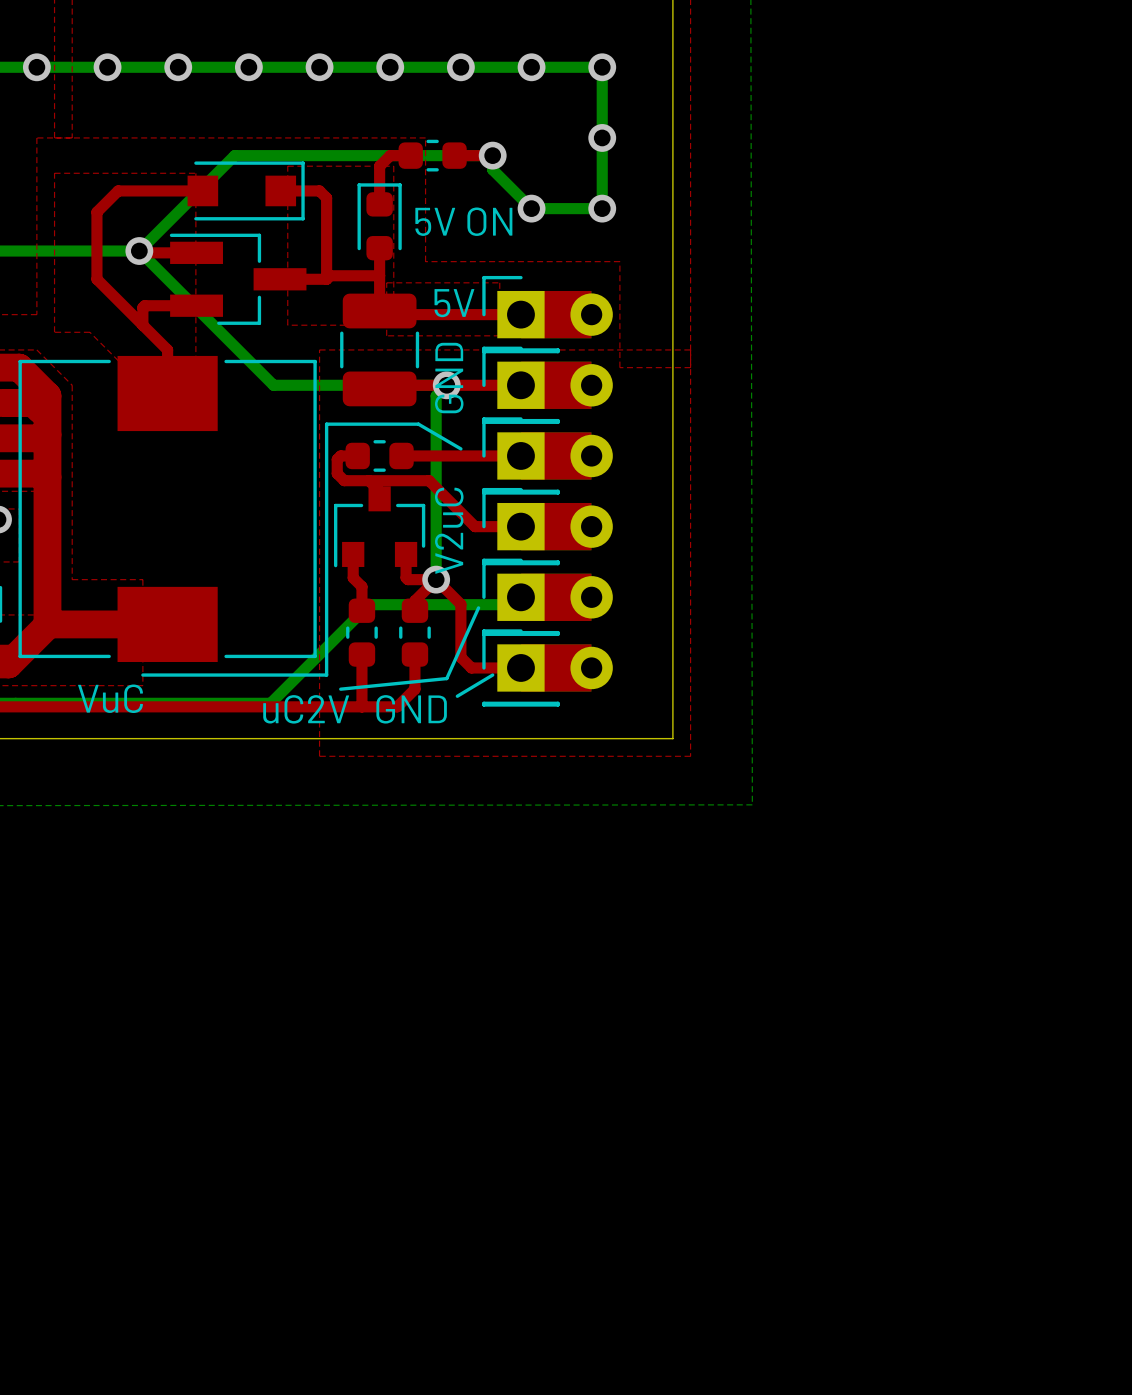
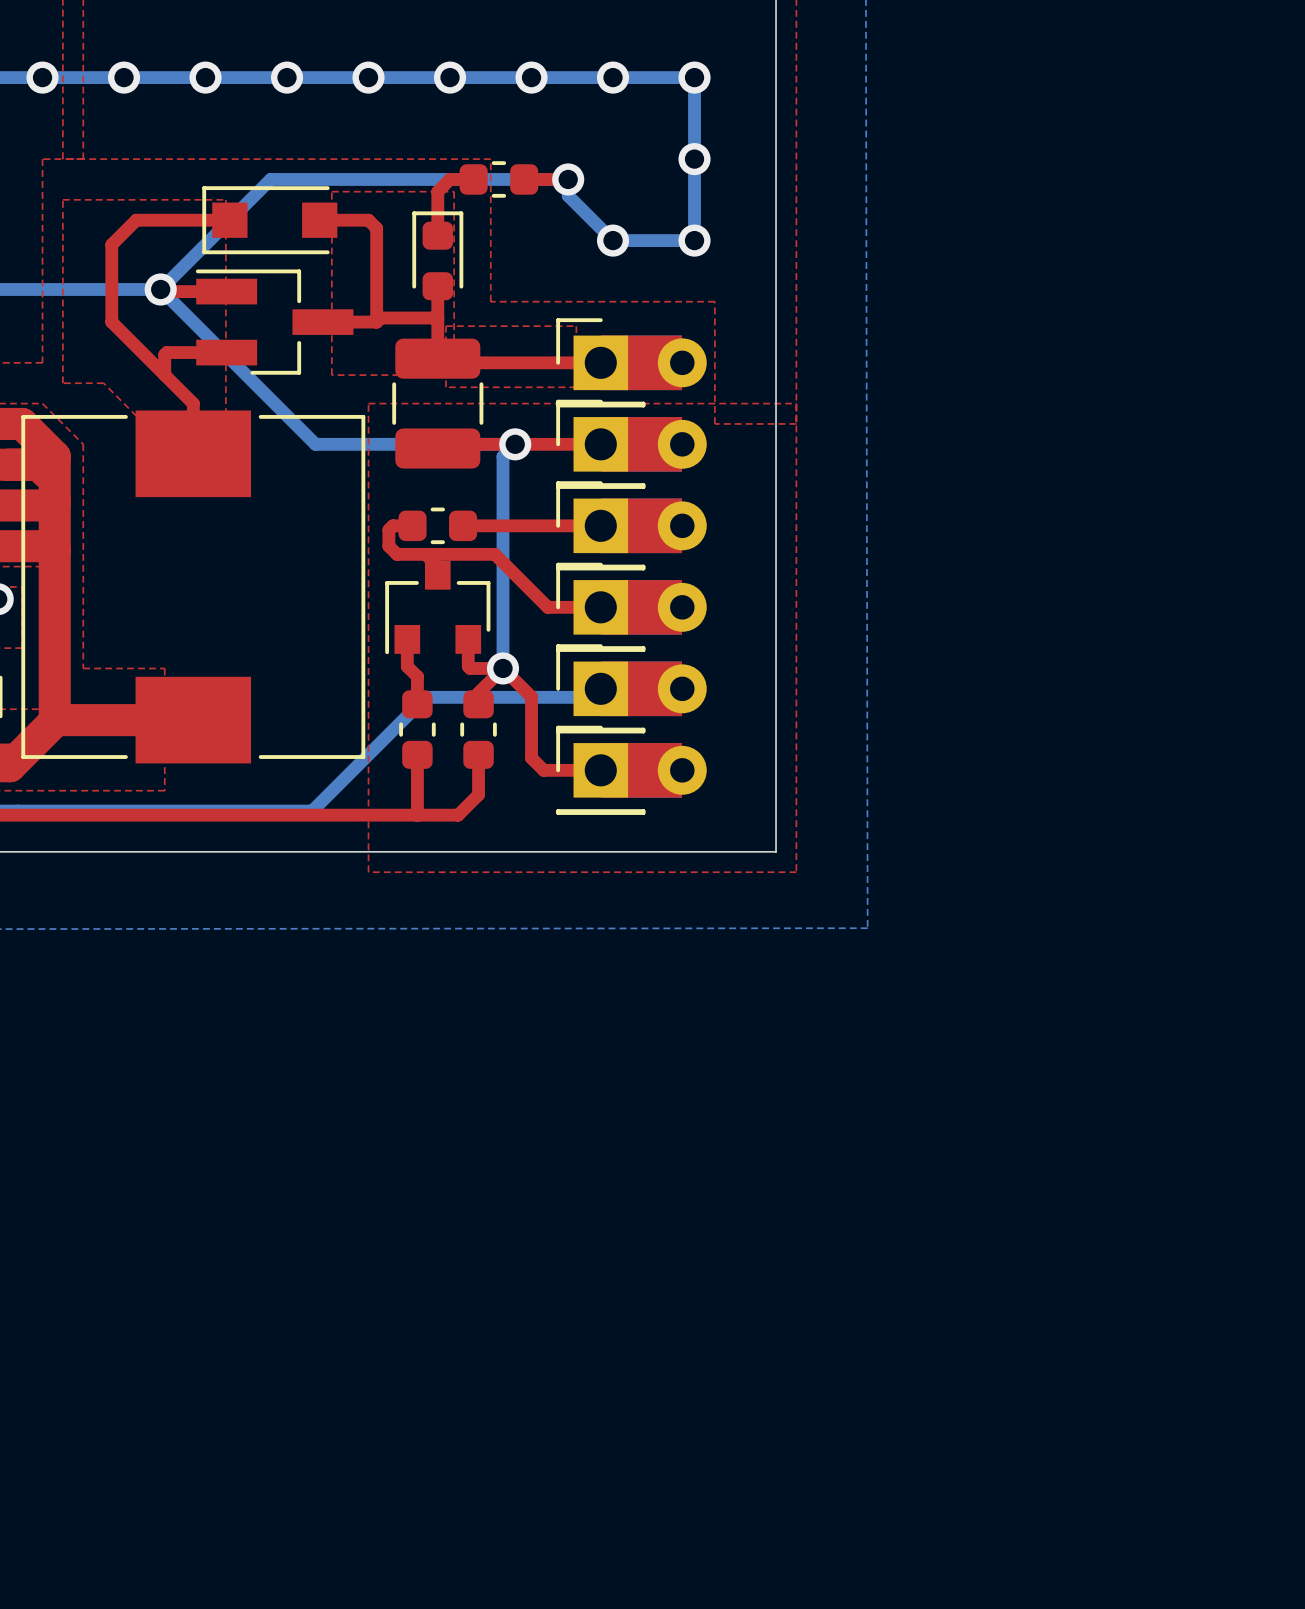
part rotation: 0° (246, 190) -> 180° (269, 220)
text: 5V ON (463, 221) -> none
text: 5V (454, 303) -> none
text: GND (449, 378) -> none
line: (460, 448) (418, 424) (326, 424) (326, 675) (142, 675) -> none
text: V2uC (449, 530) -> none
line: (478, 607) (446, 678) (340, 689) -> none
line: (492, 675) (457, 696) -> none
text: VuC (110, 698) -> none
text: uC2V (306, 709) -> none
text: GND (411, 709) -> none

